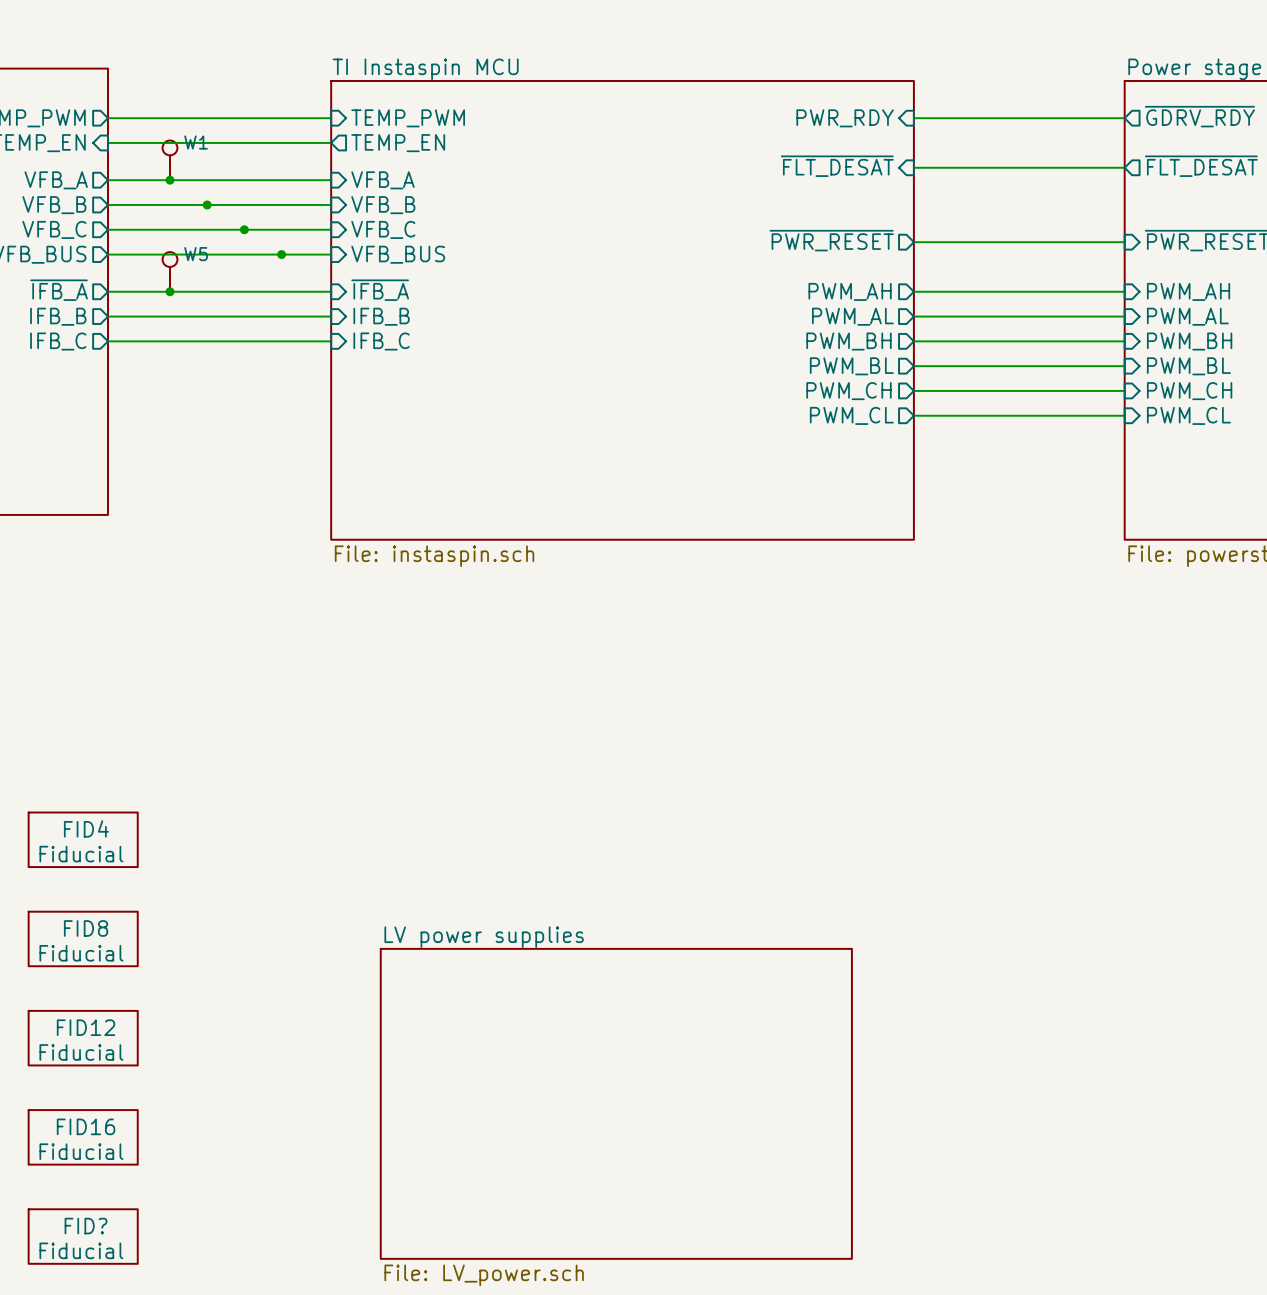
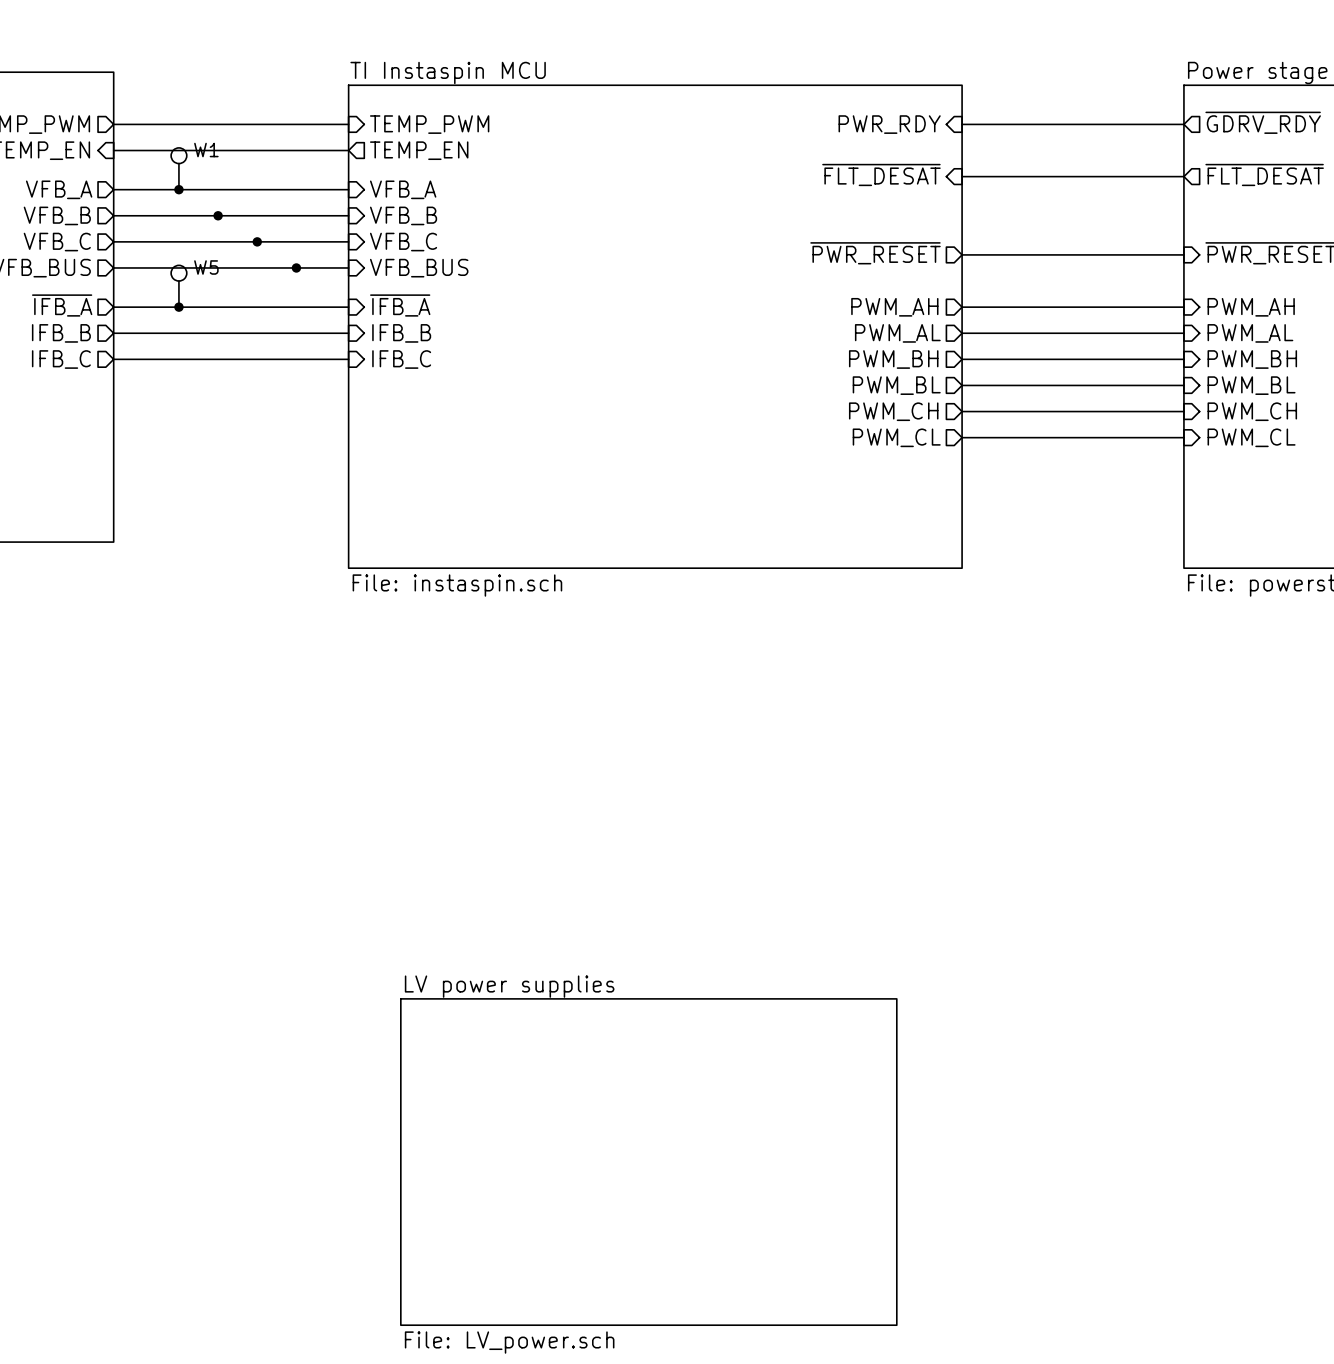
FID4: Fiducial (83, 839) -> none
FID8: Fiducial (83, 938) -> none
FID12: Fiducial (83, 1038) -> none
FID16: Fiducial (83, 1137) -> none
FID?: Fiducial (83, 1236) -> none

